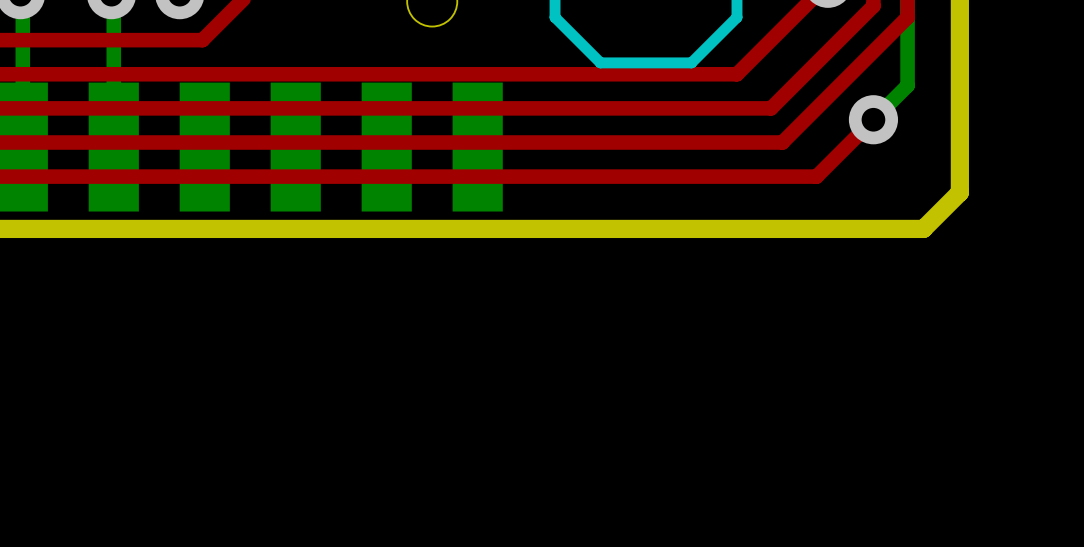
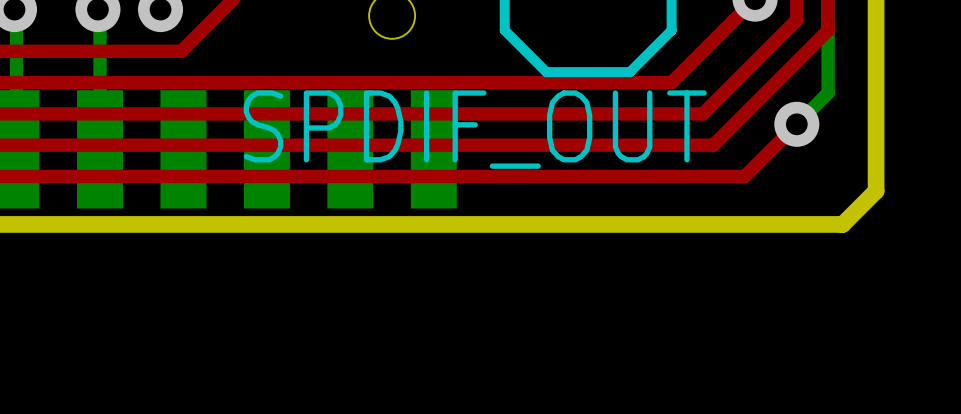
text: none -> SPDIF_OUT (475, 129)

